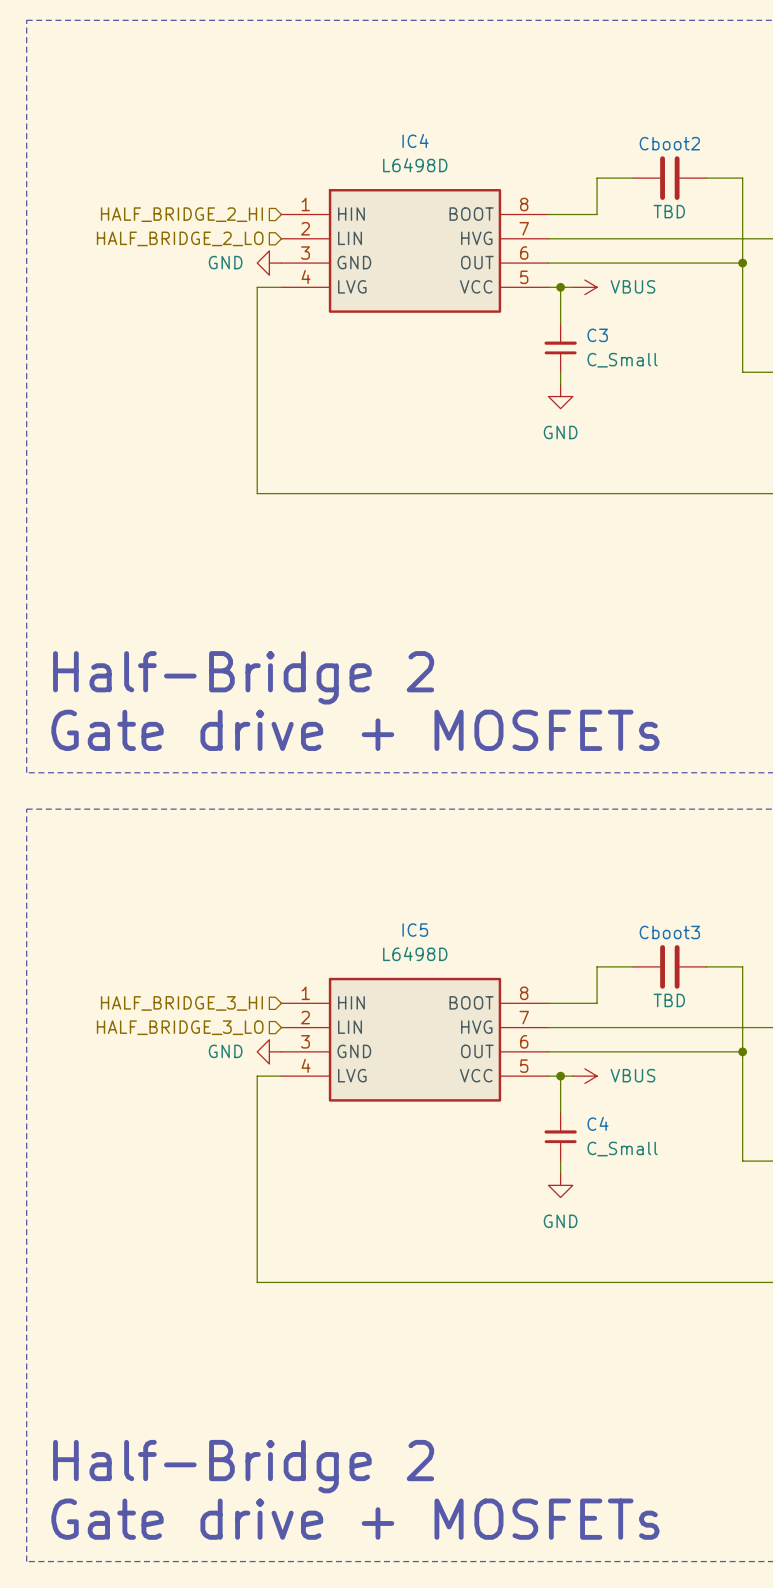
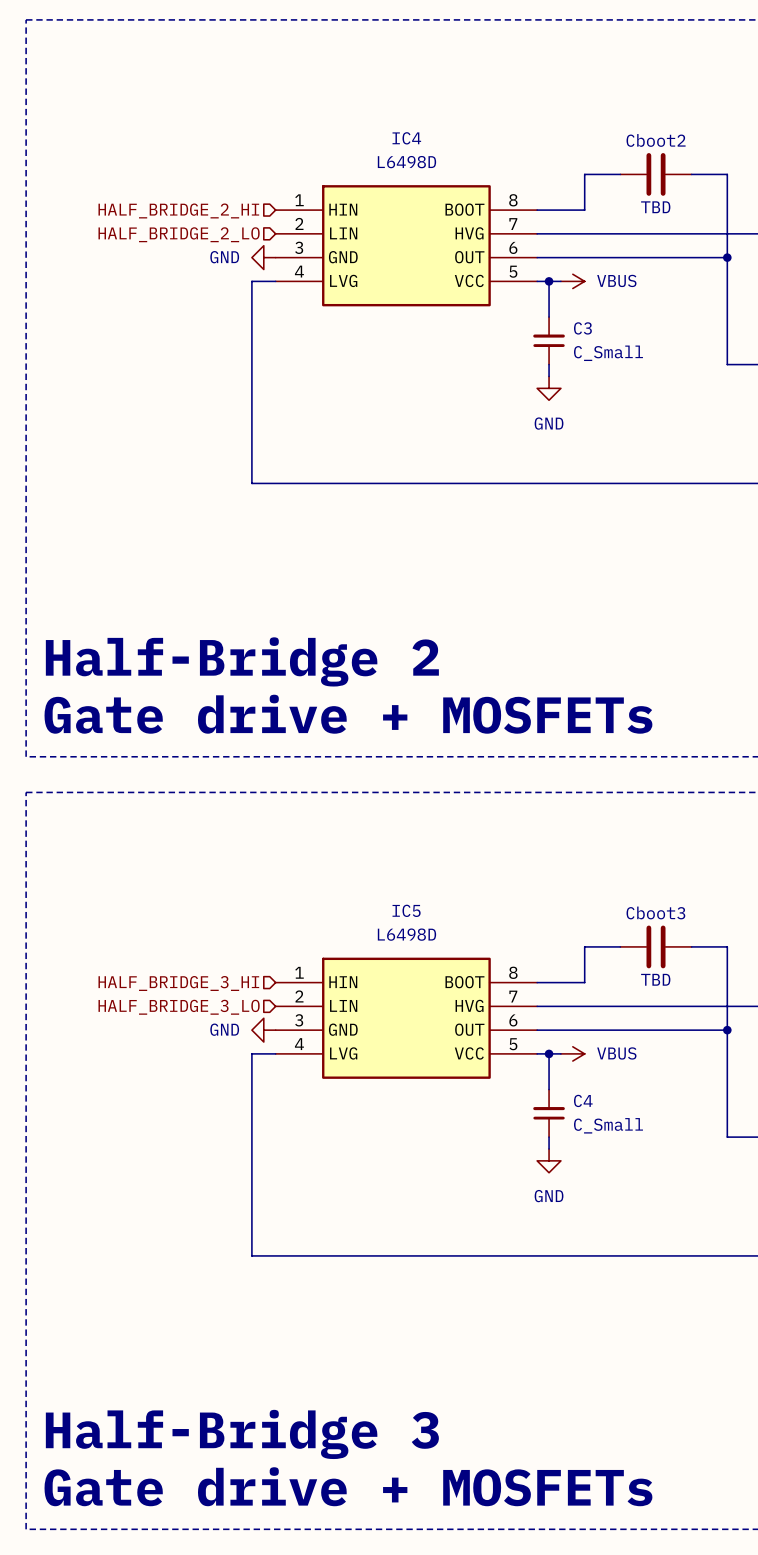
text: Half-Bridge 2 (243, 1466) -> Half-Bridge 3 (242, 1434)

